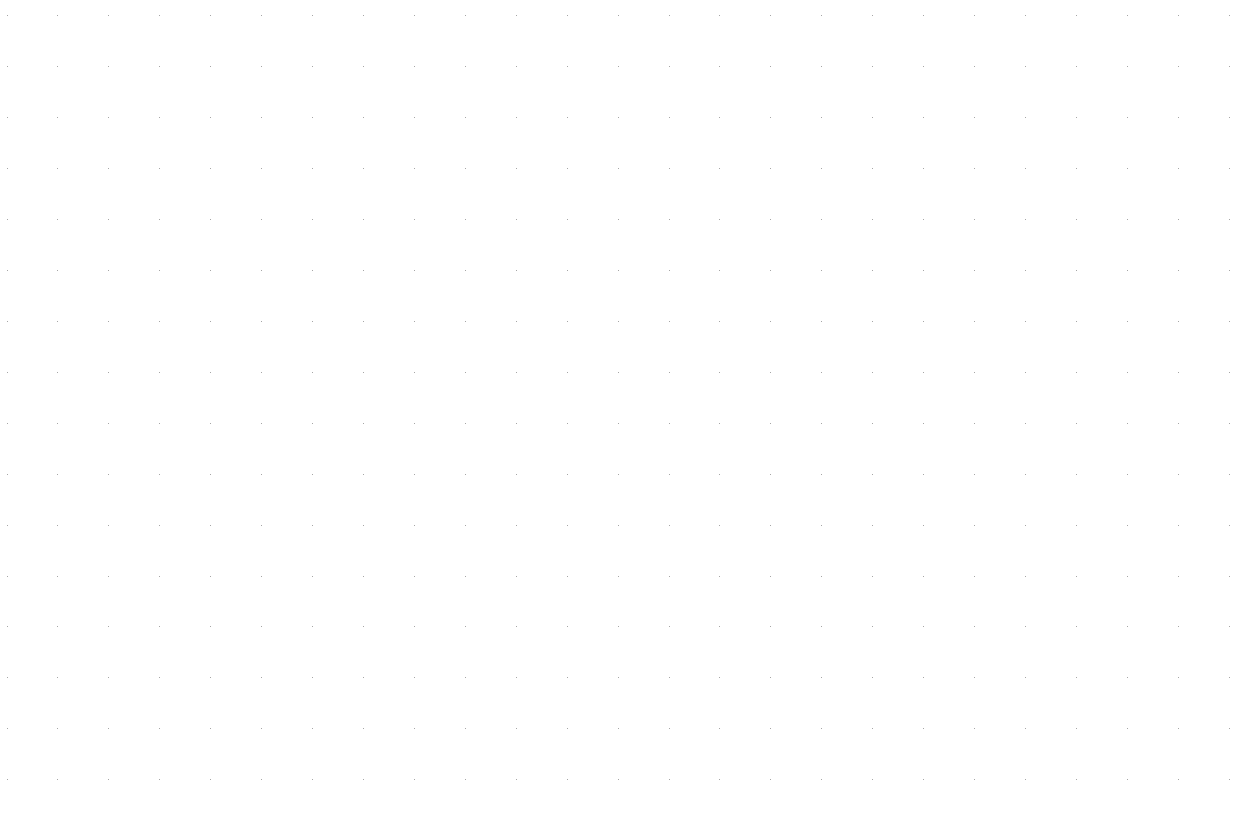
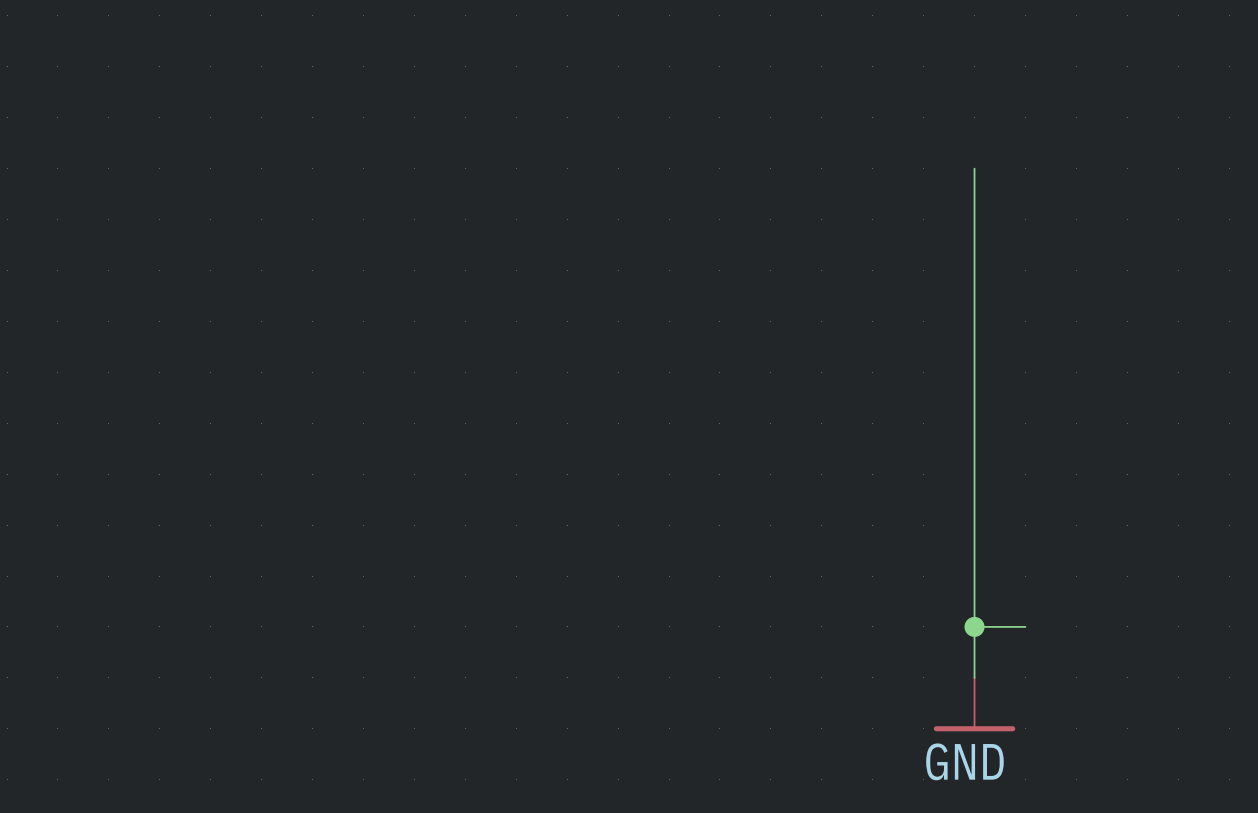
wire: none -> (974, 168) (974, 677)
wire: none -> (974, 626) (1025, 626)
junction: none -> (974, 626)
power symbol: none -> GND (974, 704)

